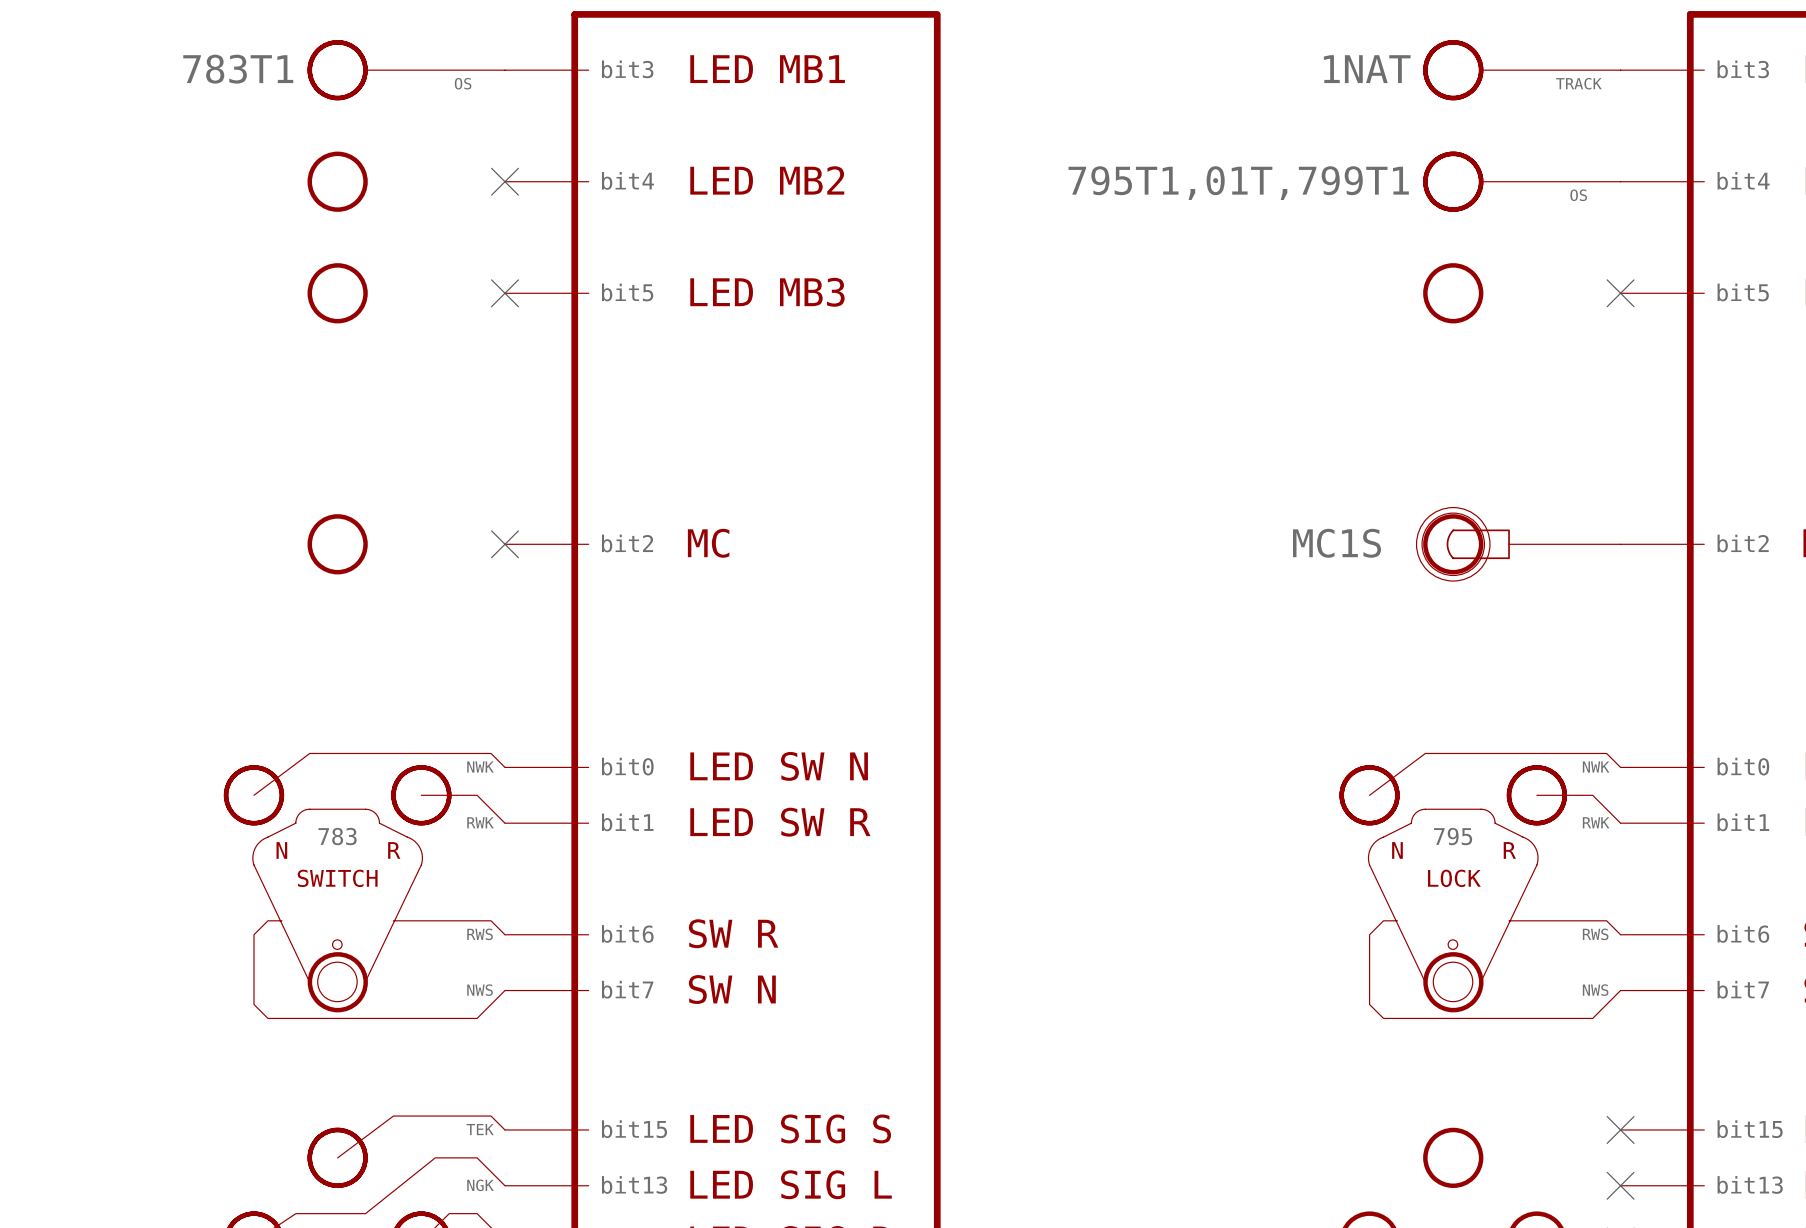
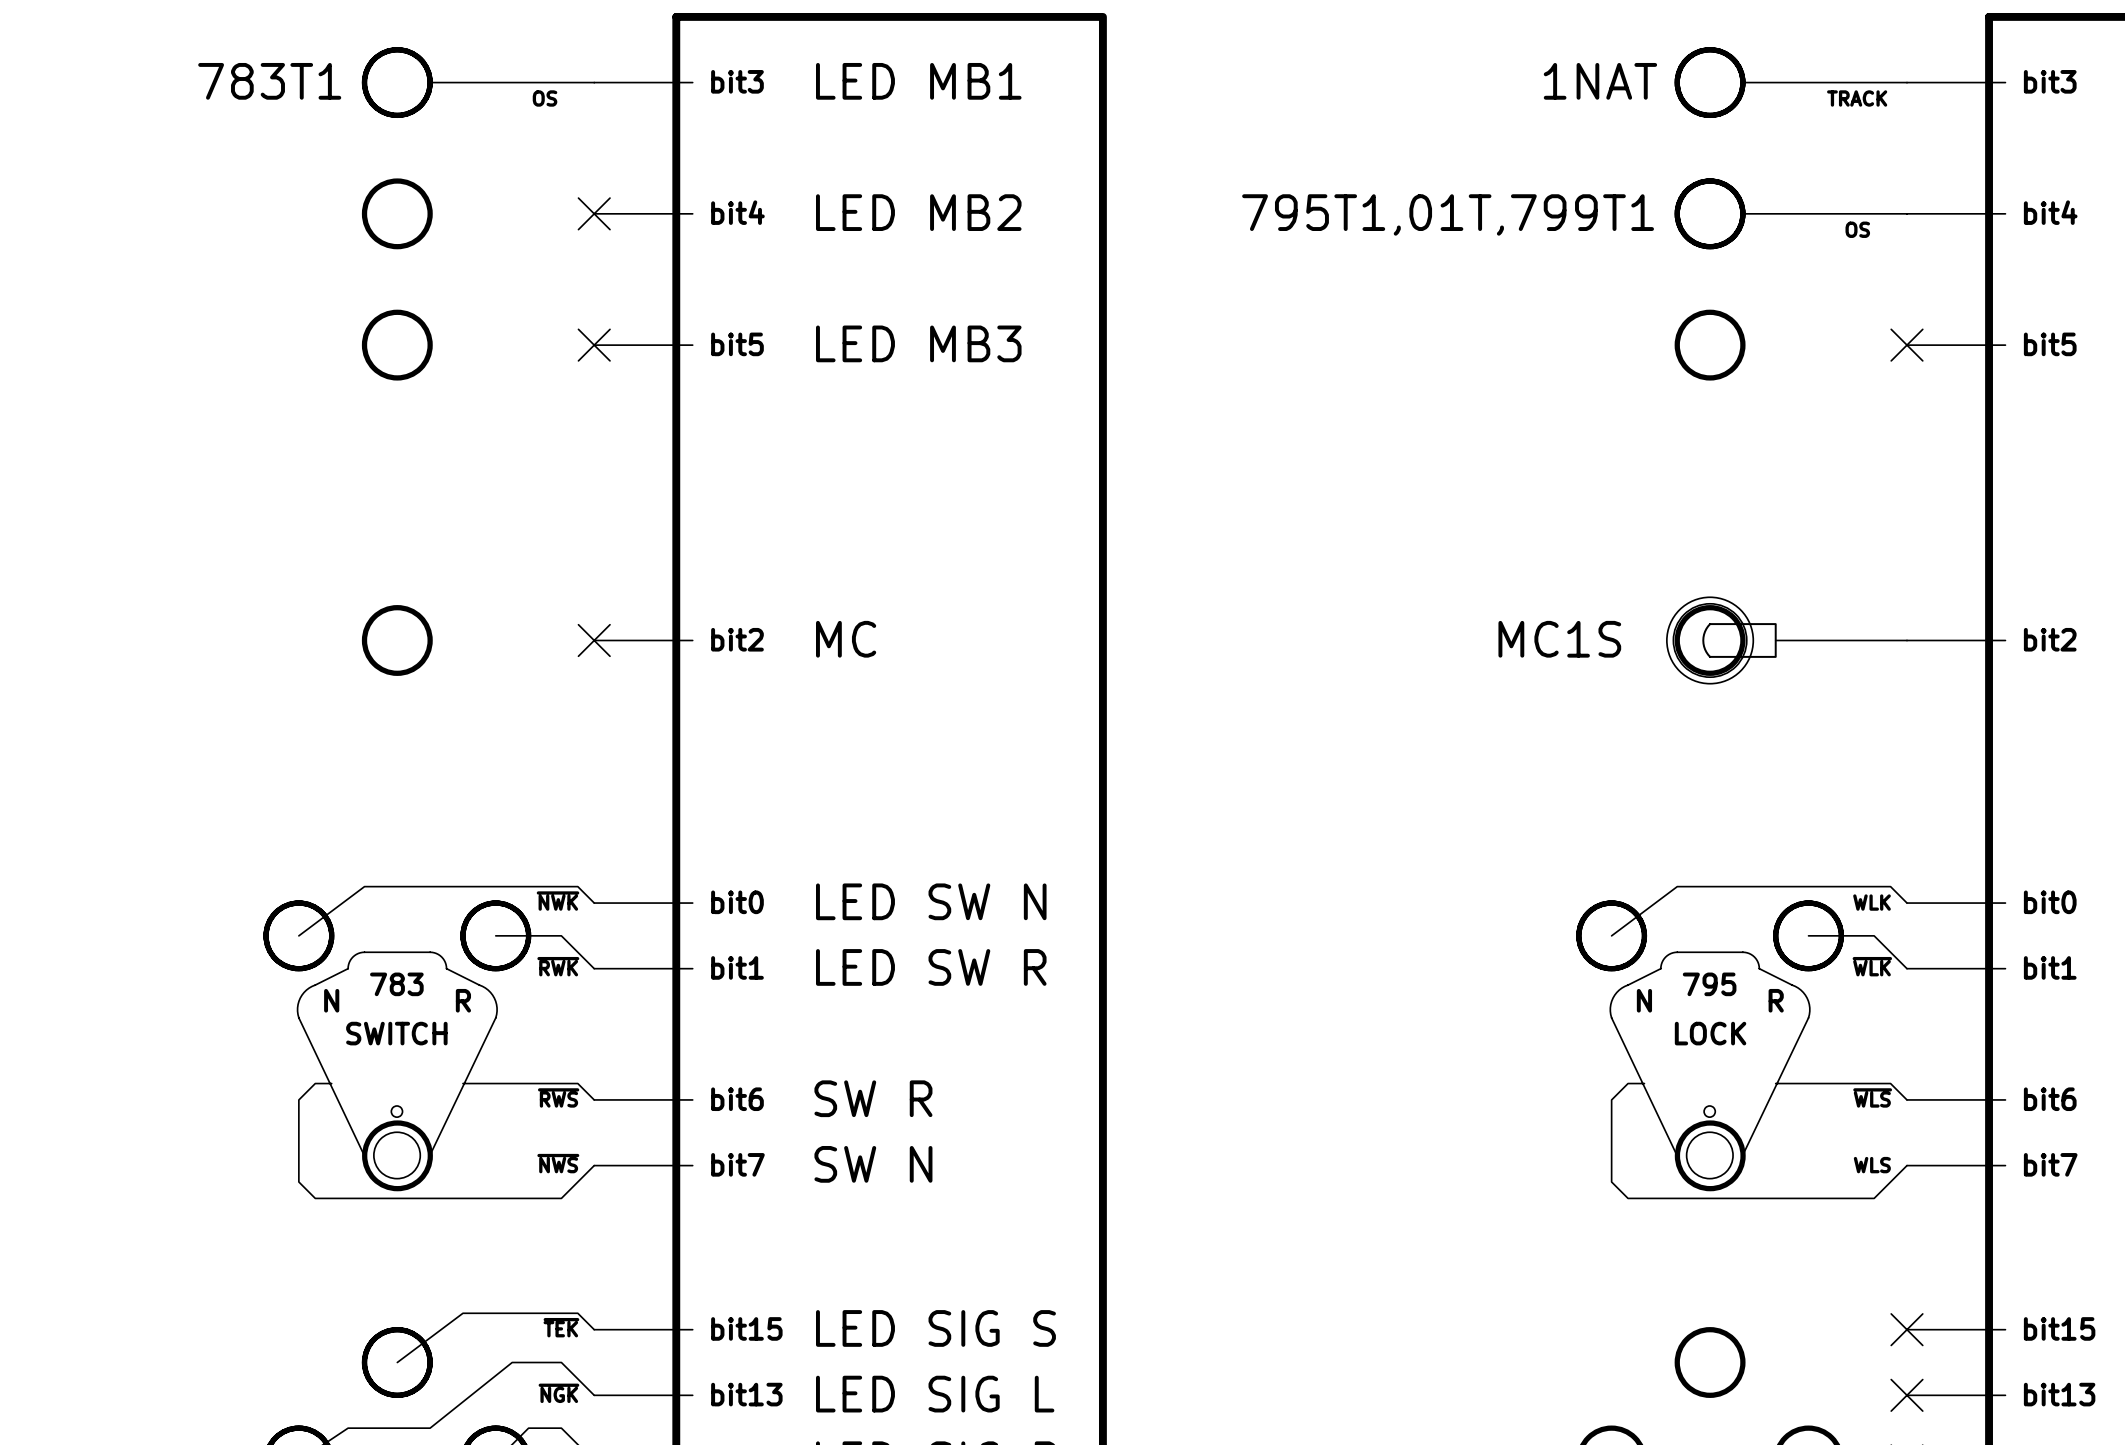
part pin name: NWK (480, 767) -> ~{NWK} (558, 901)
part pin name: NWK (1596, 767) -> WLK (1872, 902)
part pin name: RWK (480, 822) -> ~{RWK} (558, 966)
part pin name: RWK (1596, 822) -> ~{WLK} (1872, 966)
part pin name: RWS (480, 934) -> ~{RWS} (558, 1097)
part pin name: RWS (1595, 934) -> ~{WLS} (1872, 1097)
part pin name: NWS (480, 990) -> ~{NWS} (558, 1163)
part pin name: NWS (1595, 990) -> WLS (1872, 1165)
part pin name: TEK (480, 1129) -> ~{TEK} (561, 1327)
part pin name: NGK (480, 1185) -> ~{NGK} (558, 1393)

